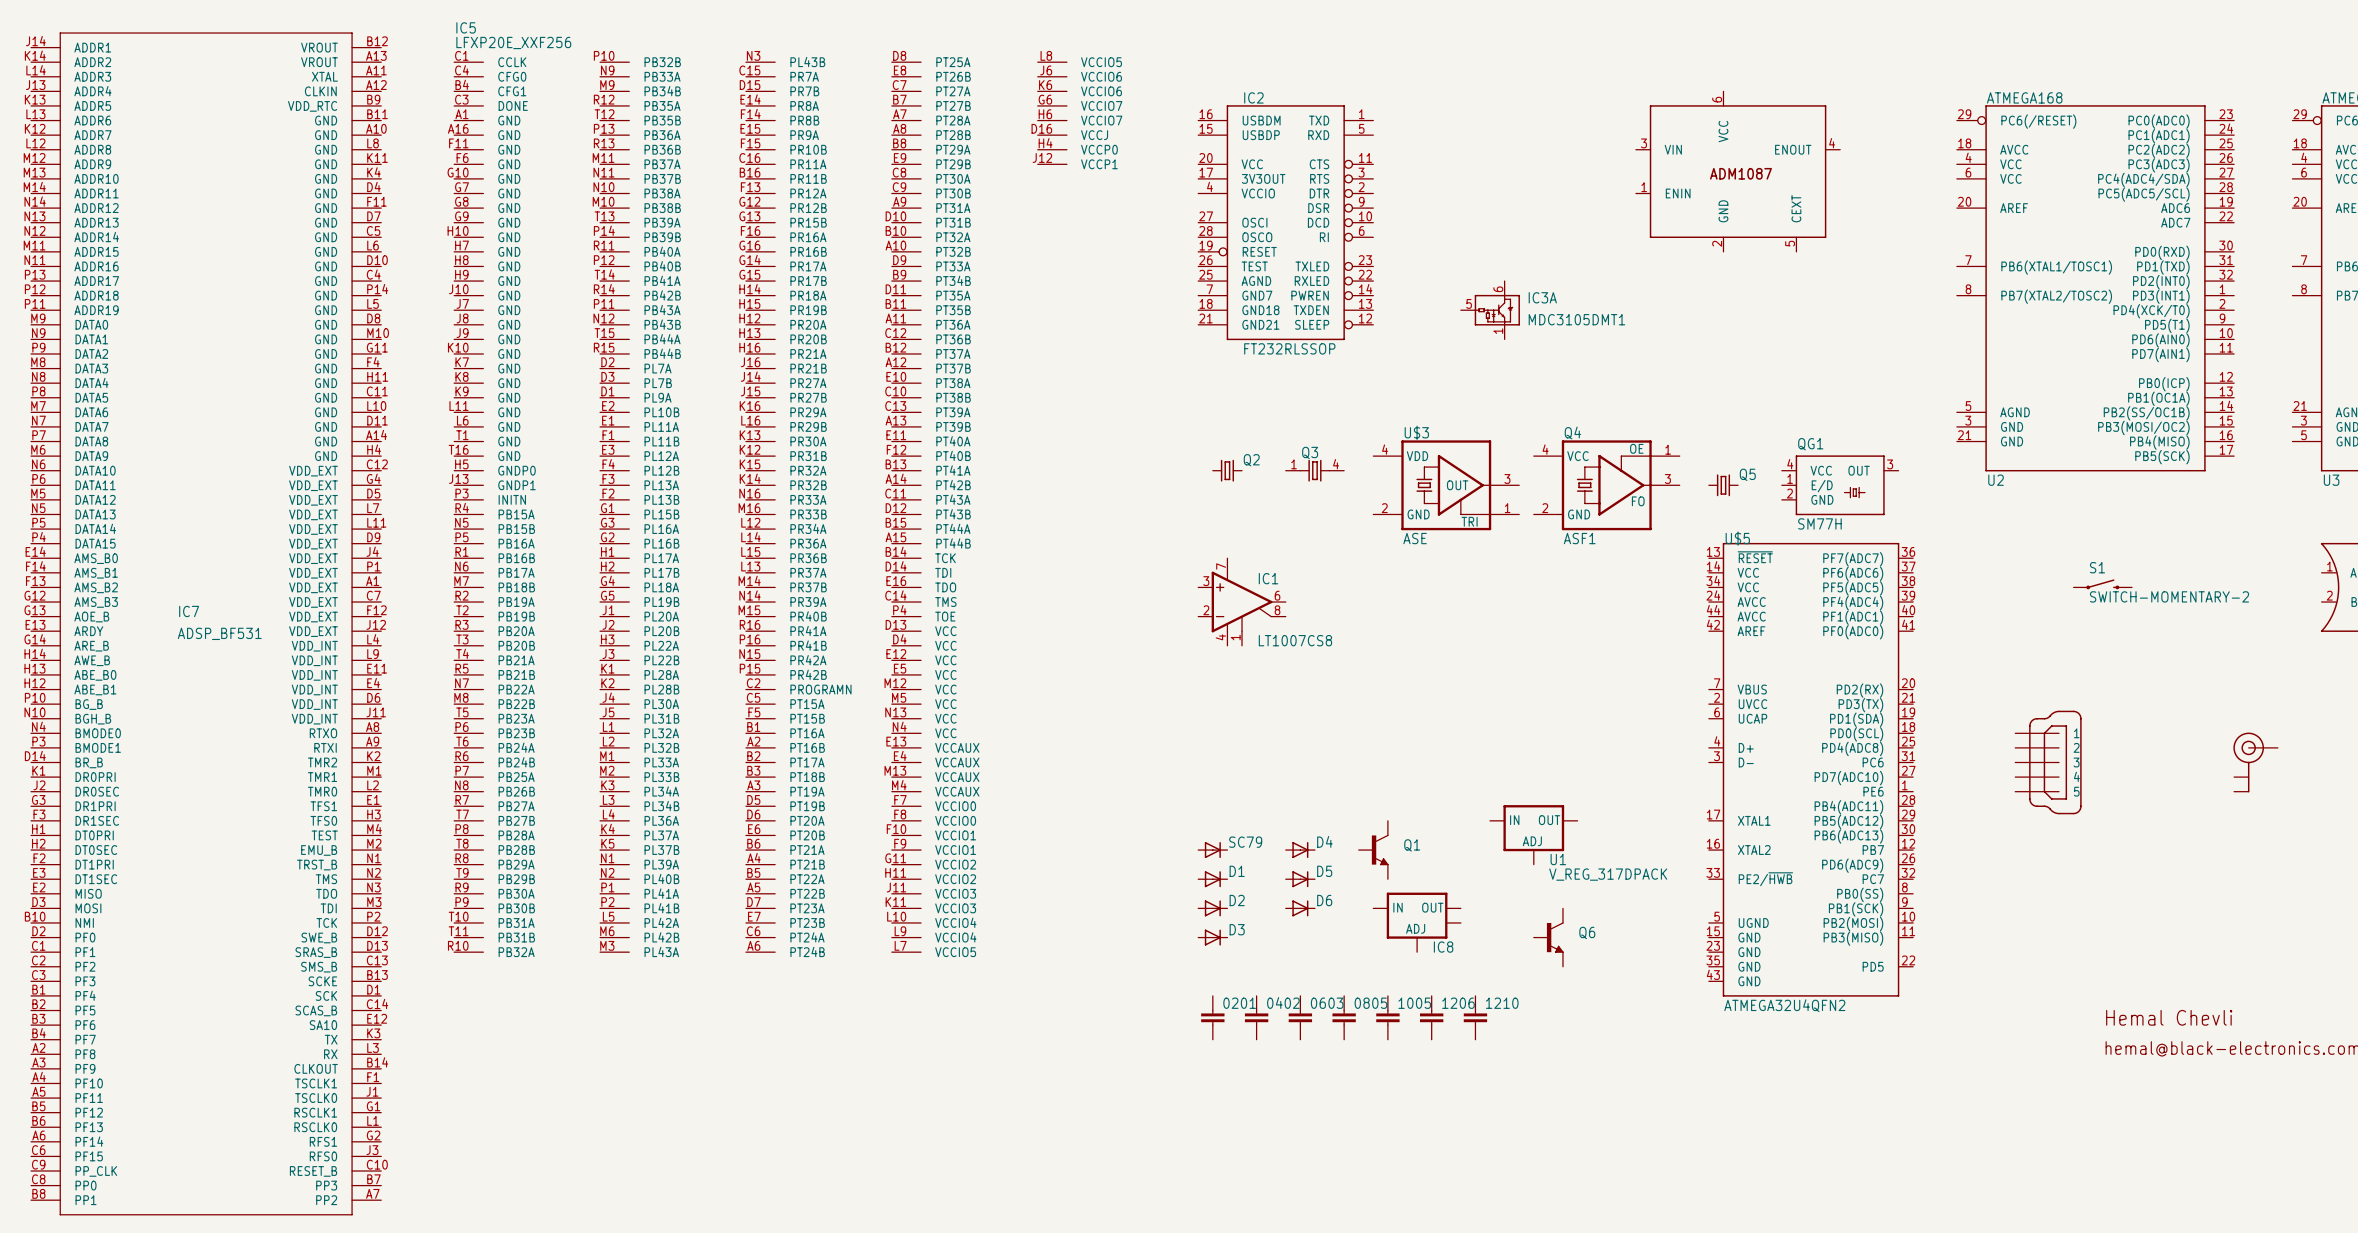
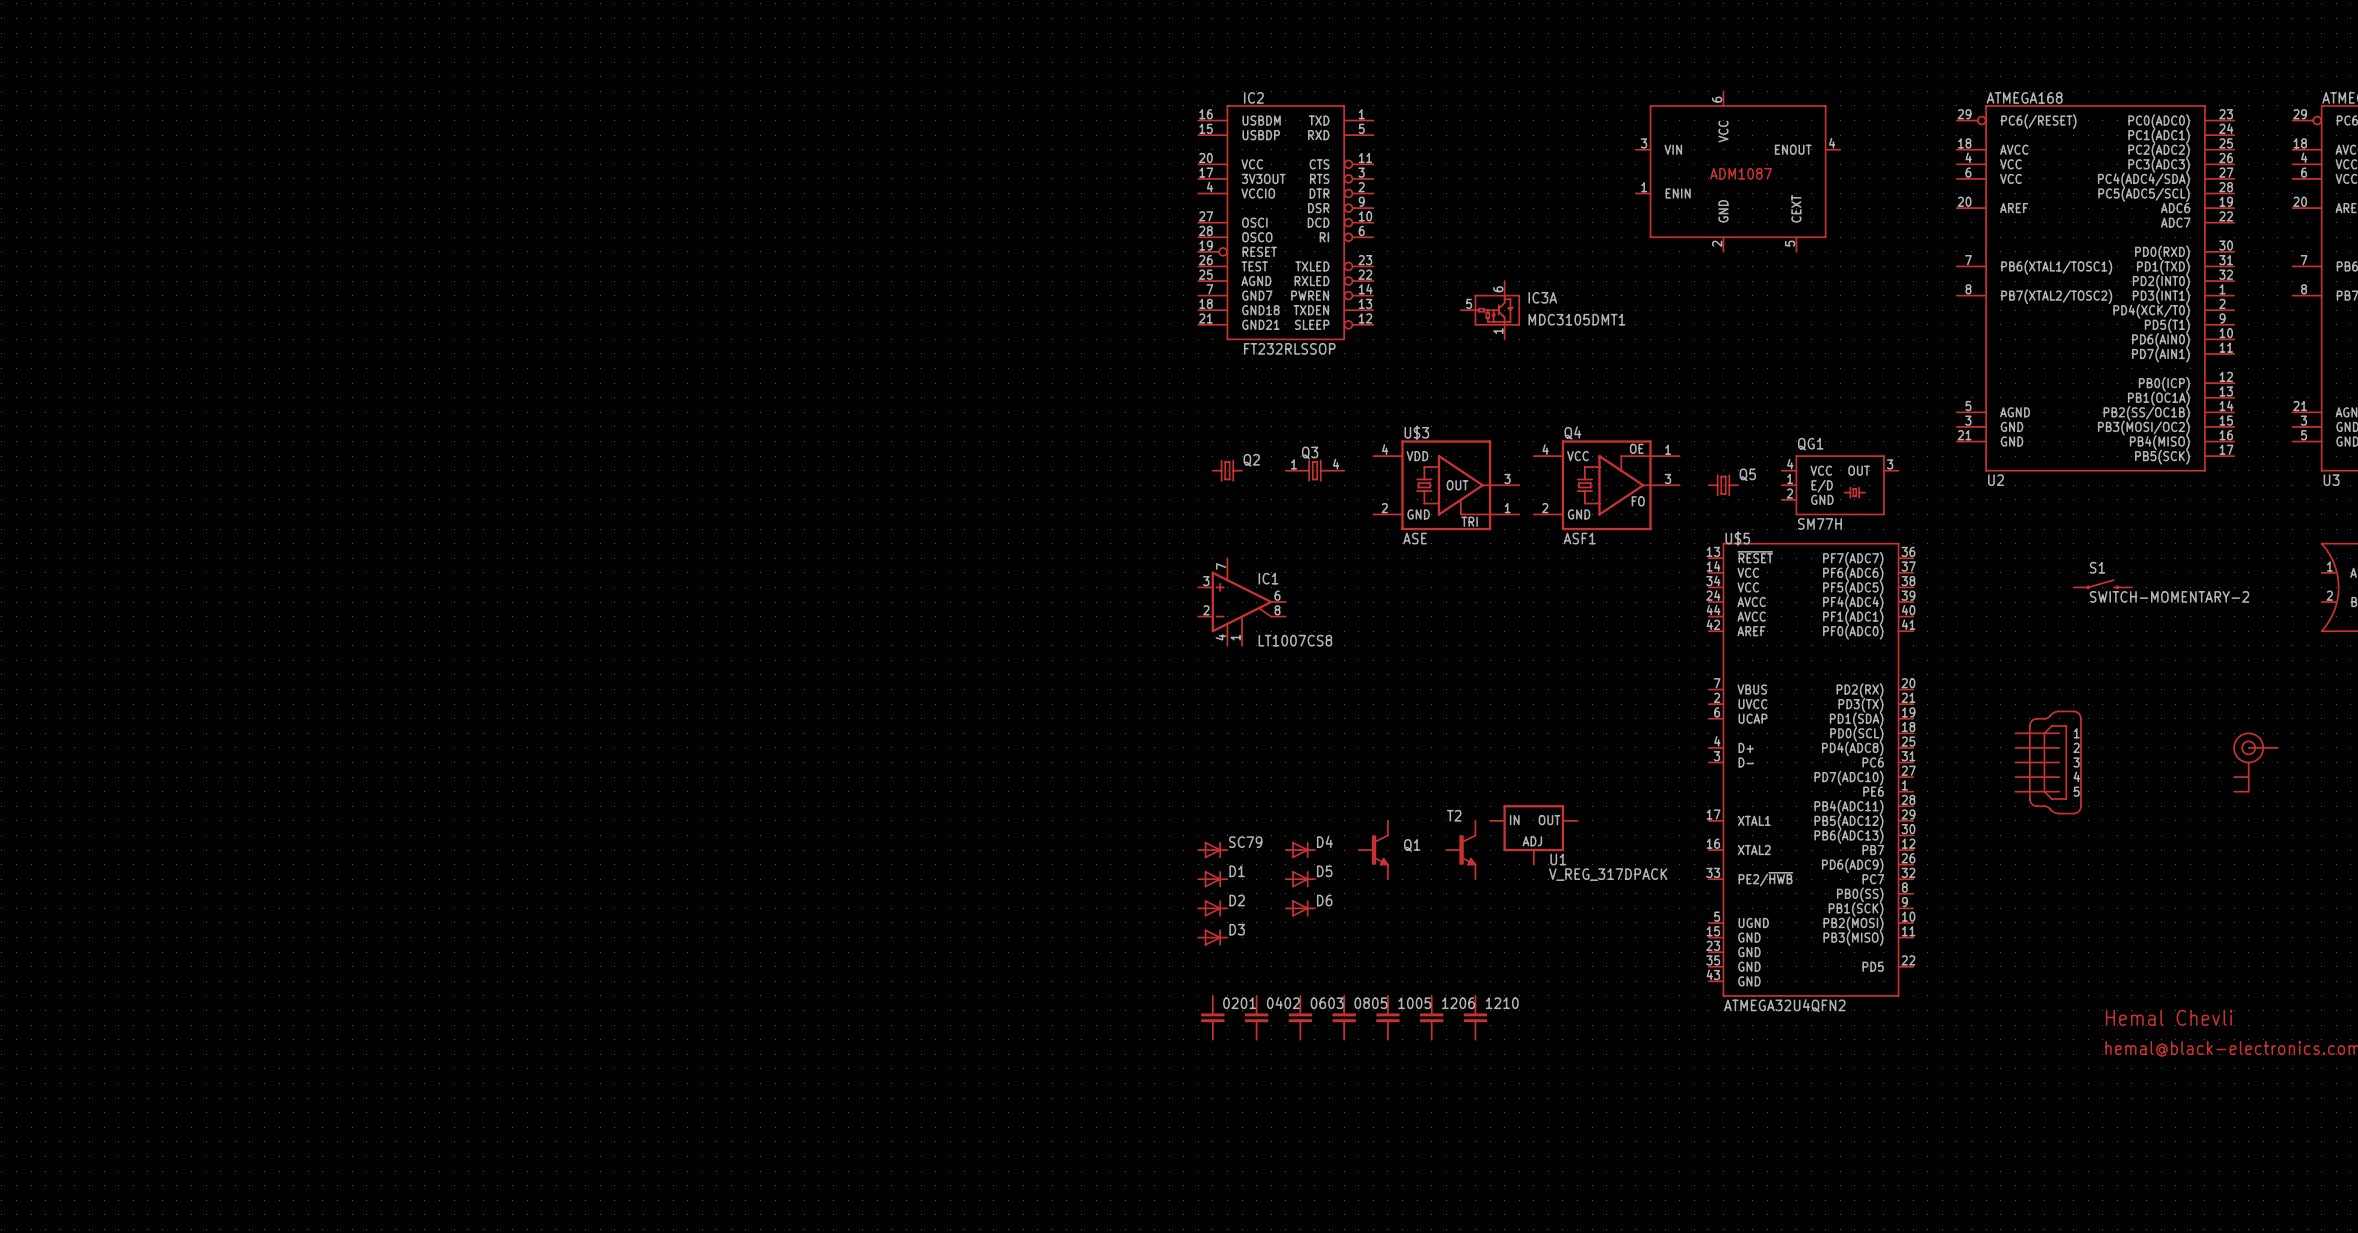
IC5: LFXP20E_XXF256 (760, 507) -> none
IC7: ADSP_BF531 (206, 623) -> none
T2: none -> (1461, 850)
IC8: (1417, 922) -> none
Q6: (1548, 937) -> none

